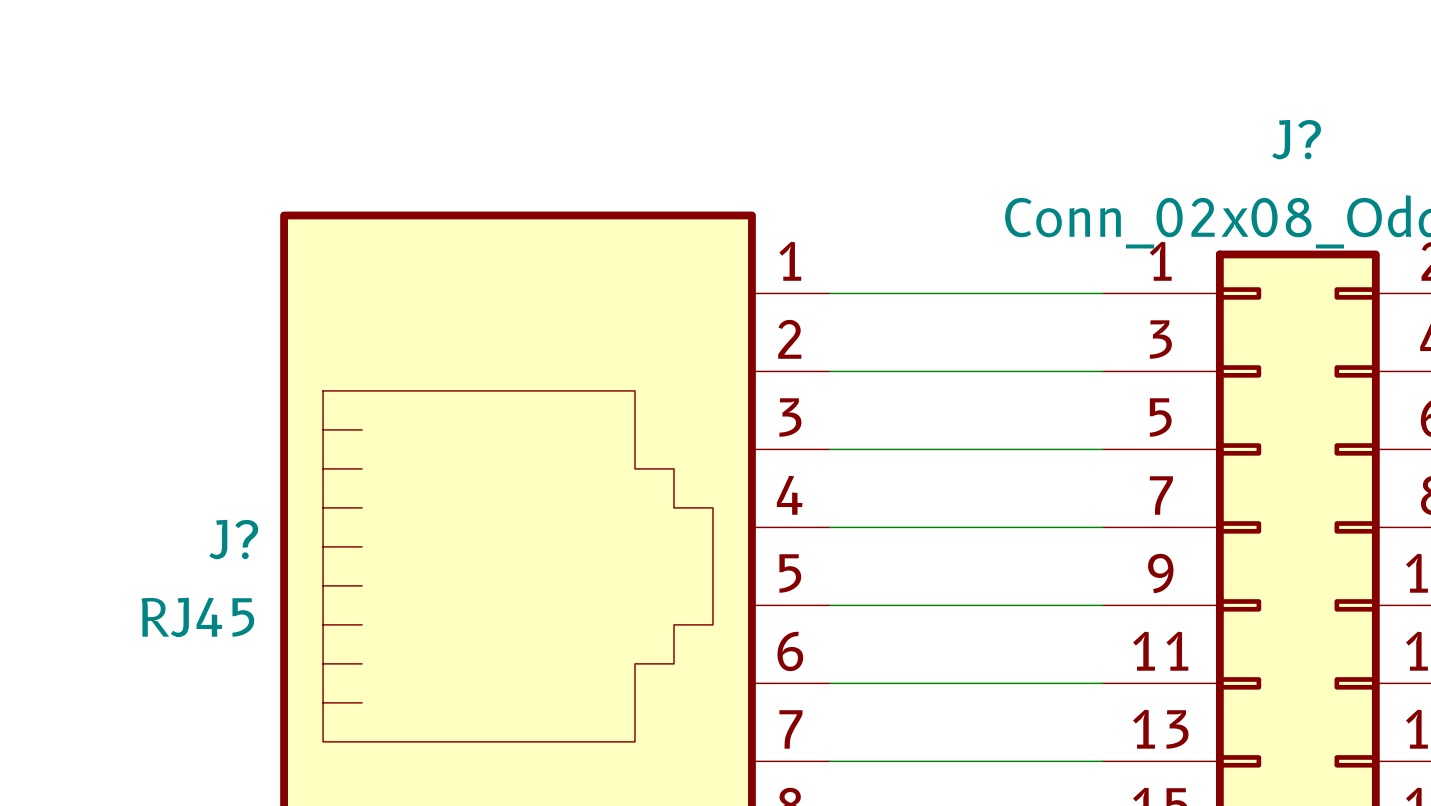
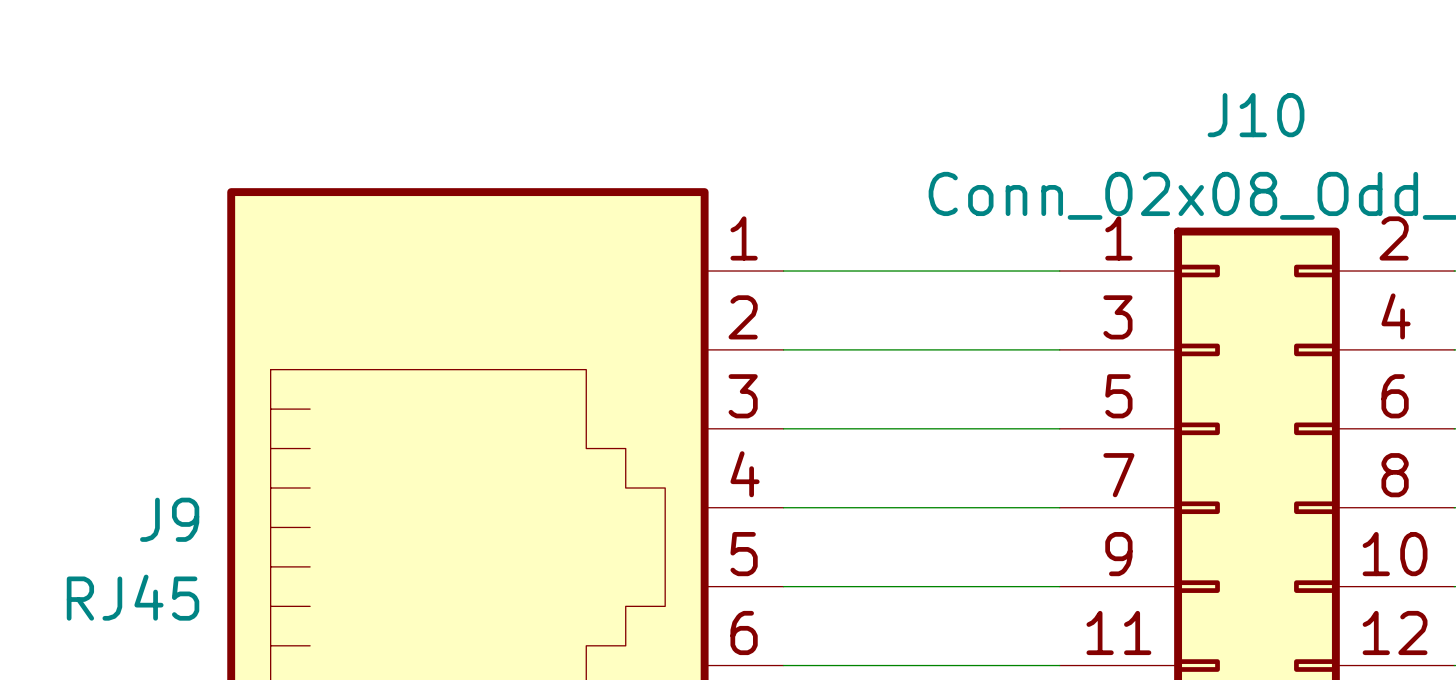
J? name: J? (1296, 139) -> J10 (1256, 115)
J? name: J? (233, 539) -> J9 (169, 519)

